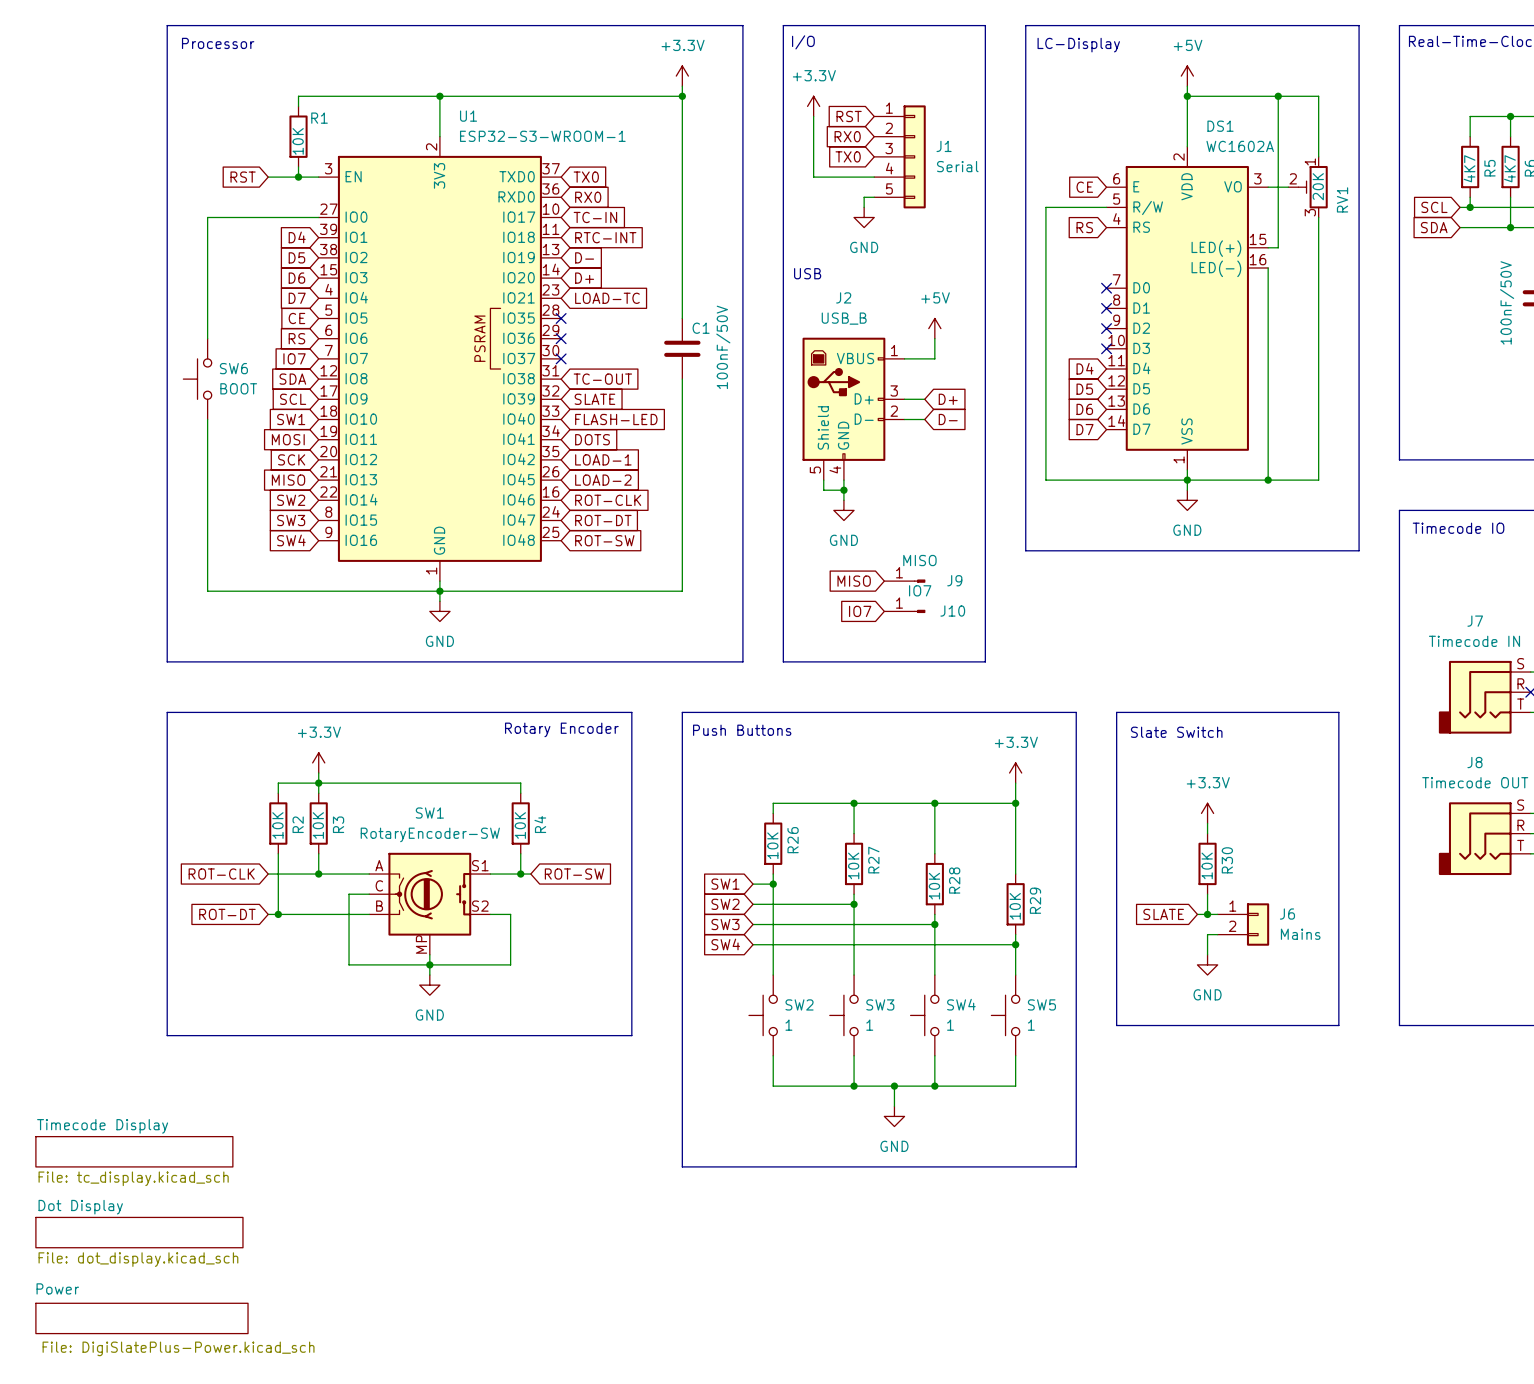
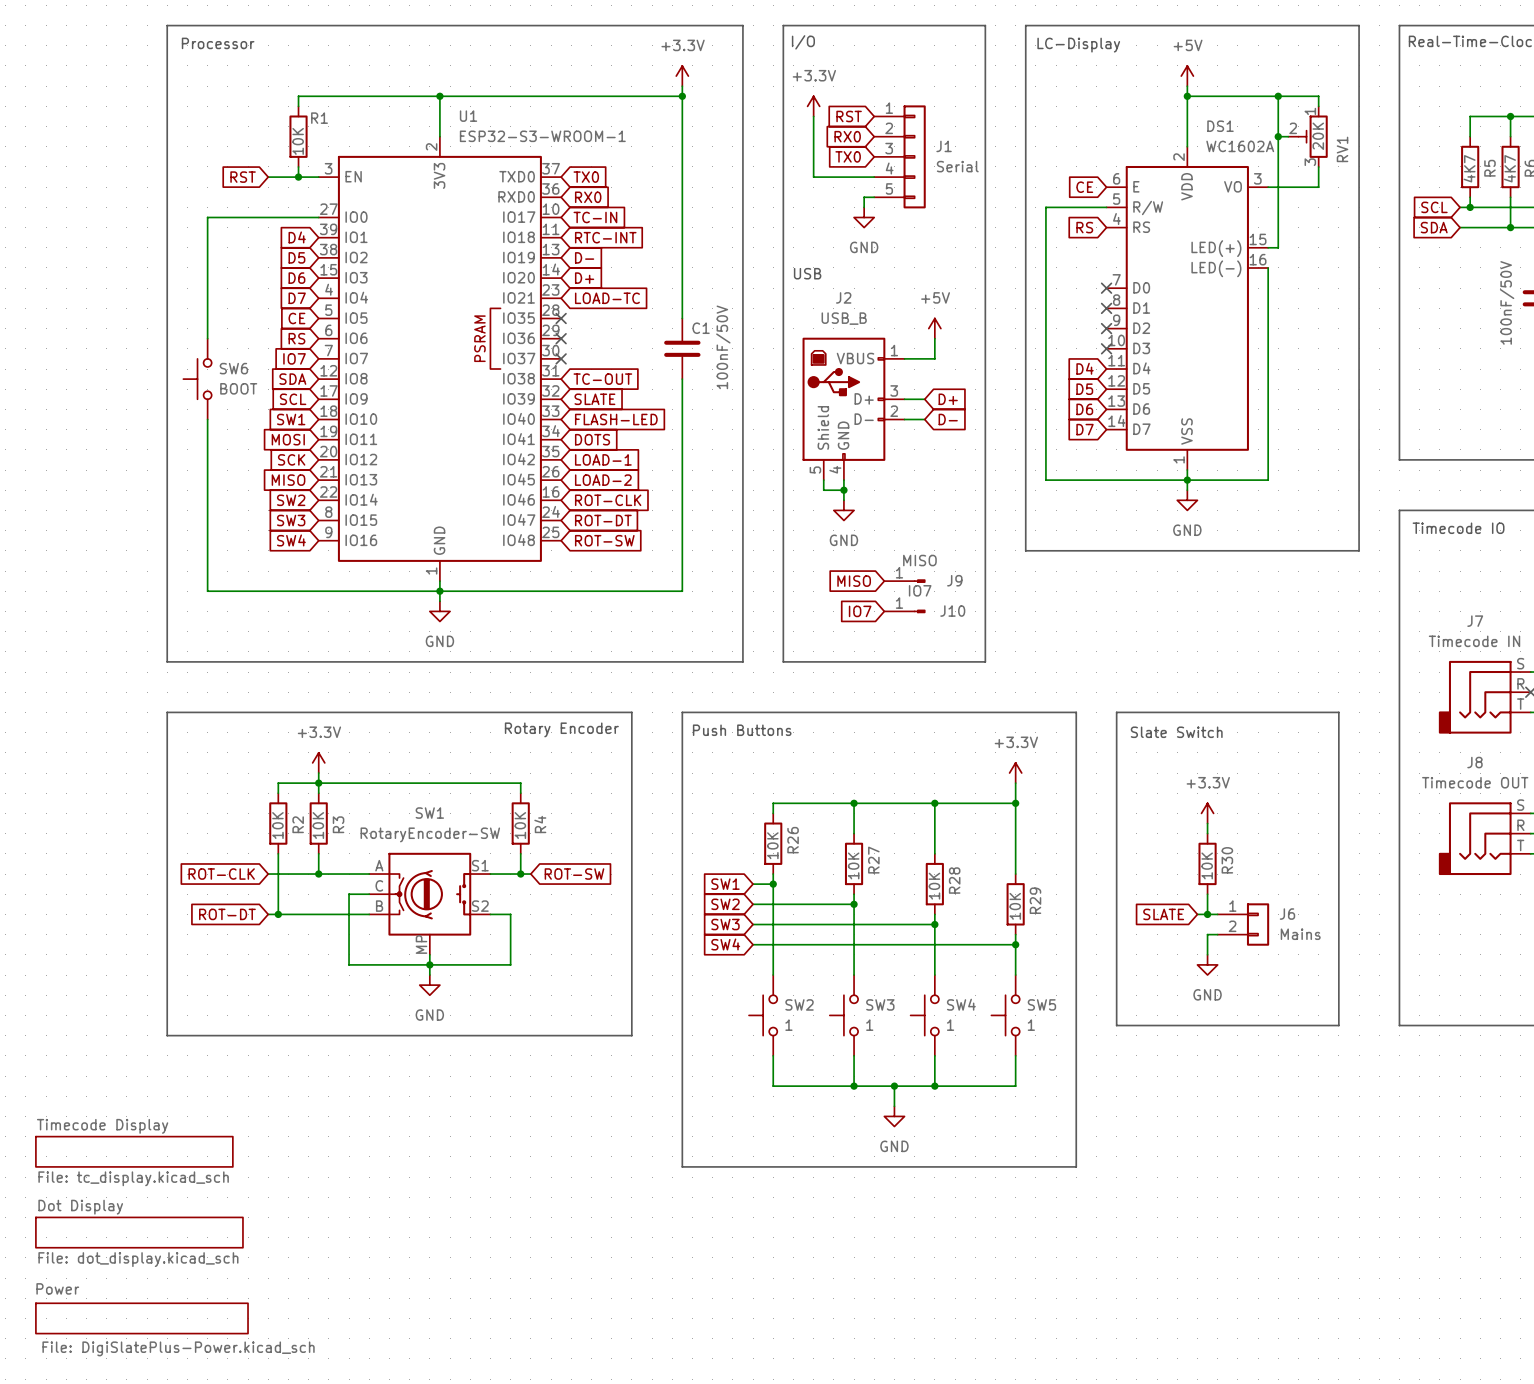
wire: (1318, 106) (1318, 156) -> none
wire: none -> (1278, 136) (1288, 136)
junction: none -> (1278, 136)
RV1 position: (1308, 187) -> (1308, 136)
wire: (1318, 217) (1318, 480) (1268, 480) -> none
junction: (1268, 480) -> none

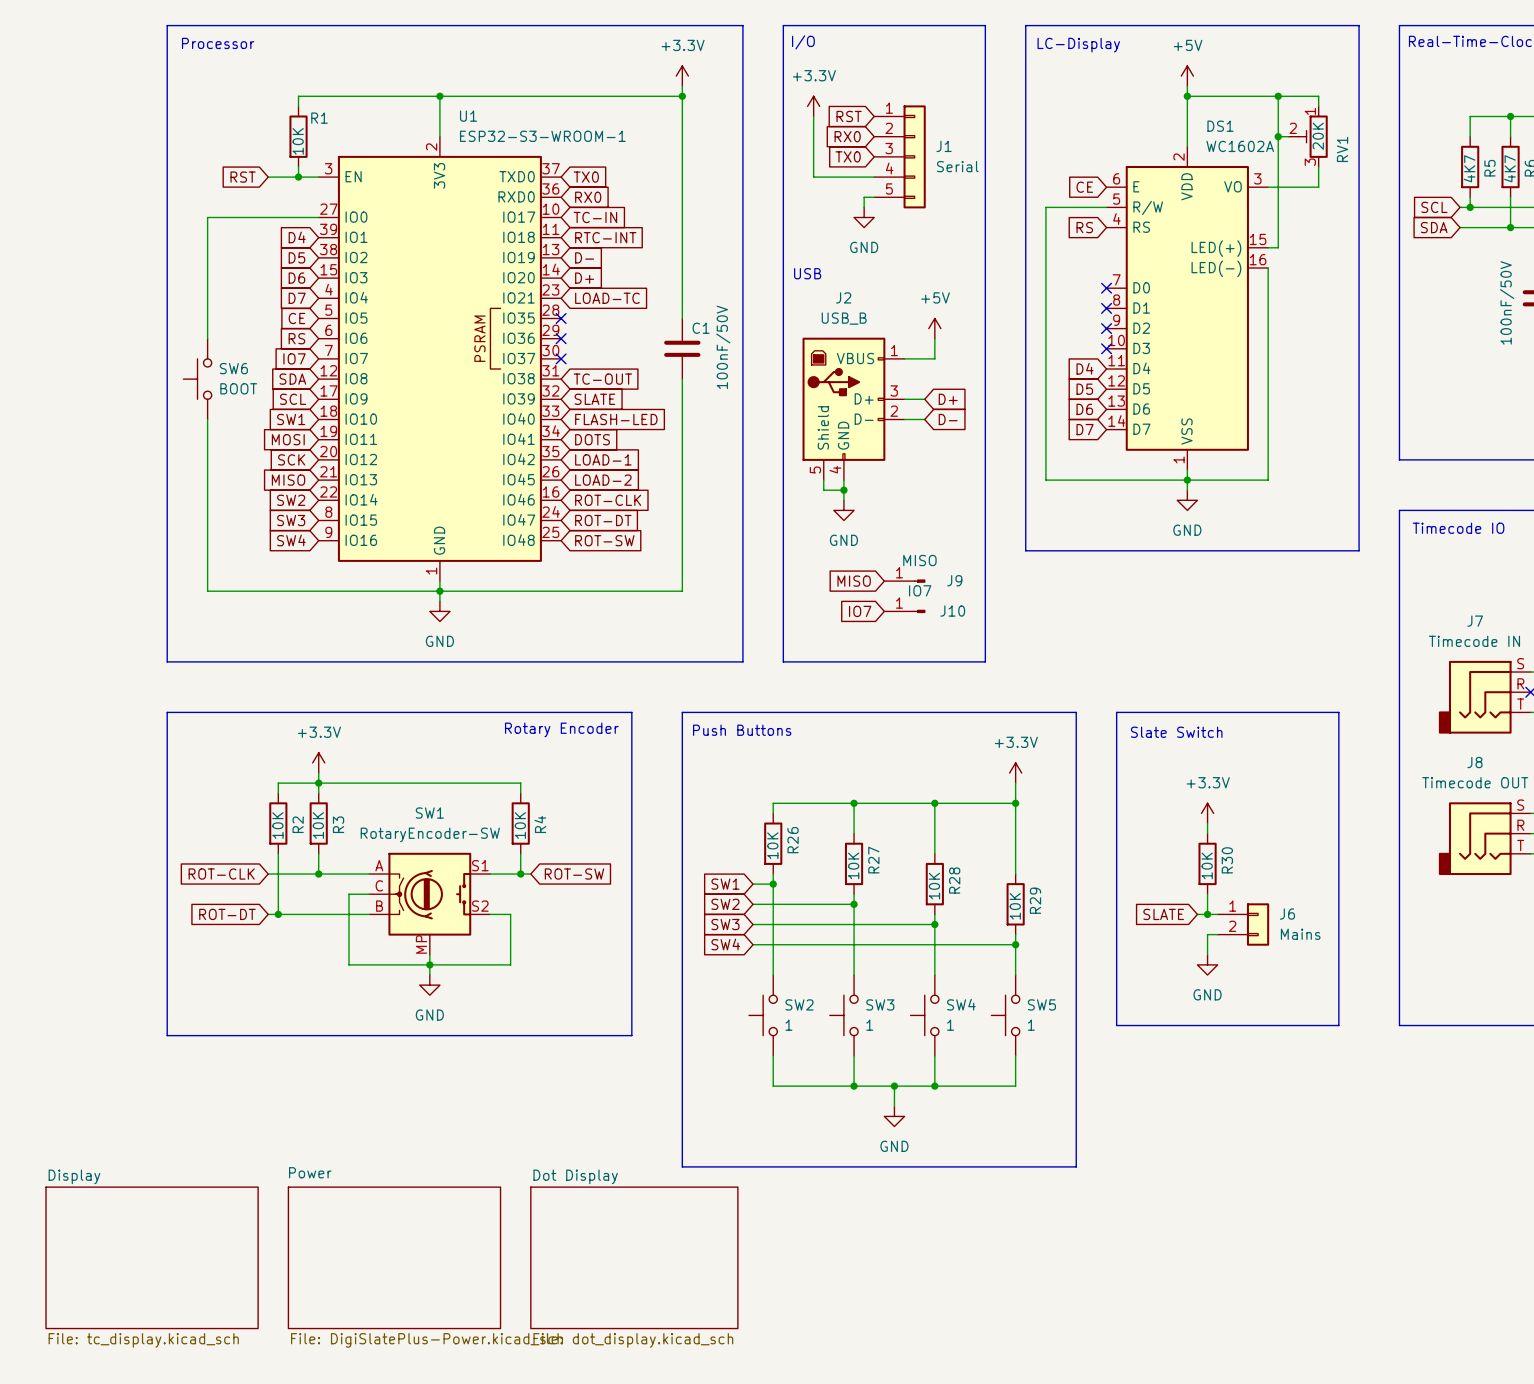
sheet Timecode Display: File: tc_display.kicad_sch (134, 1151) -> none
sheet Dot Display: File: dot_display.kicad_sch (139, 1232) -> none
sheet Display: none -> File: tc_display.kicad_sch (152, 1257)
sheet Power: none -> File: DigiSlatePlus-Power.kicad_sch (394, 1257)
sheet Dot Display: none -> File: dot_display.kicad_sch (634, 1257)
sheet Power: File: DigiSlatePlus-Power.kicad_sch (141, 1318) -> none

